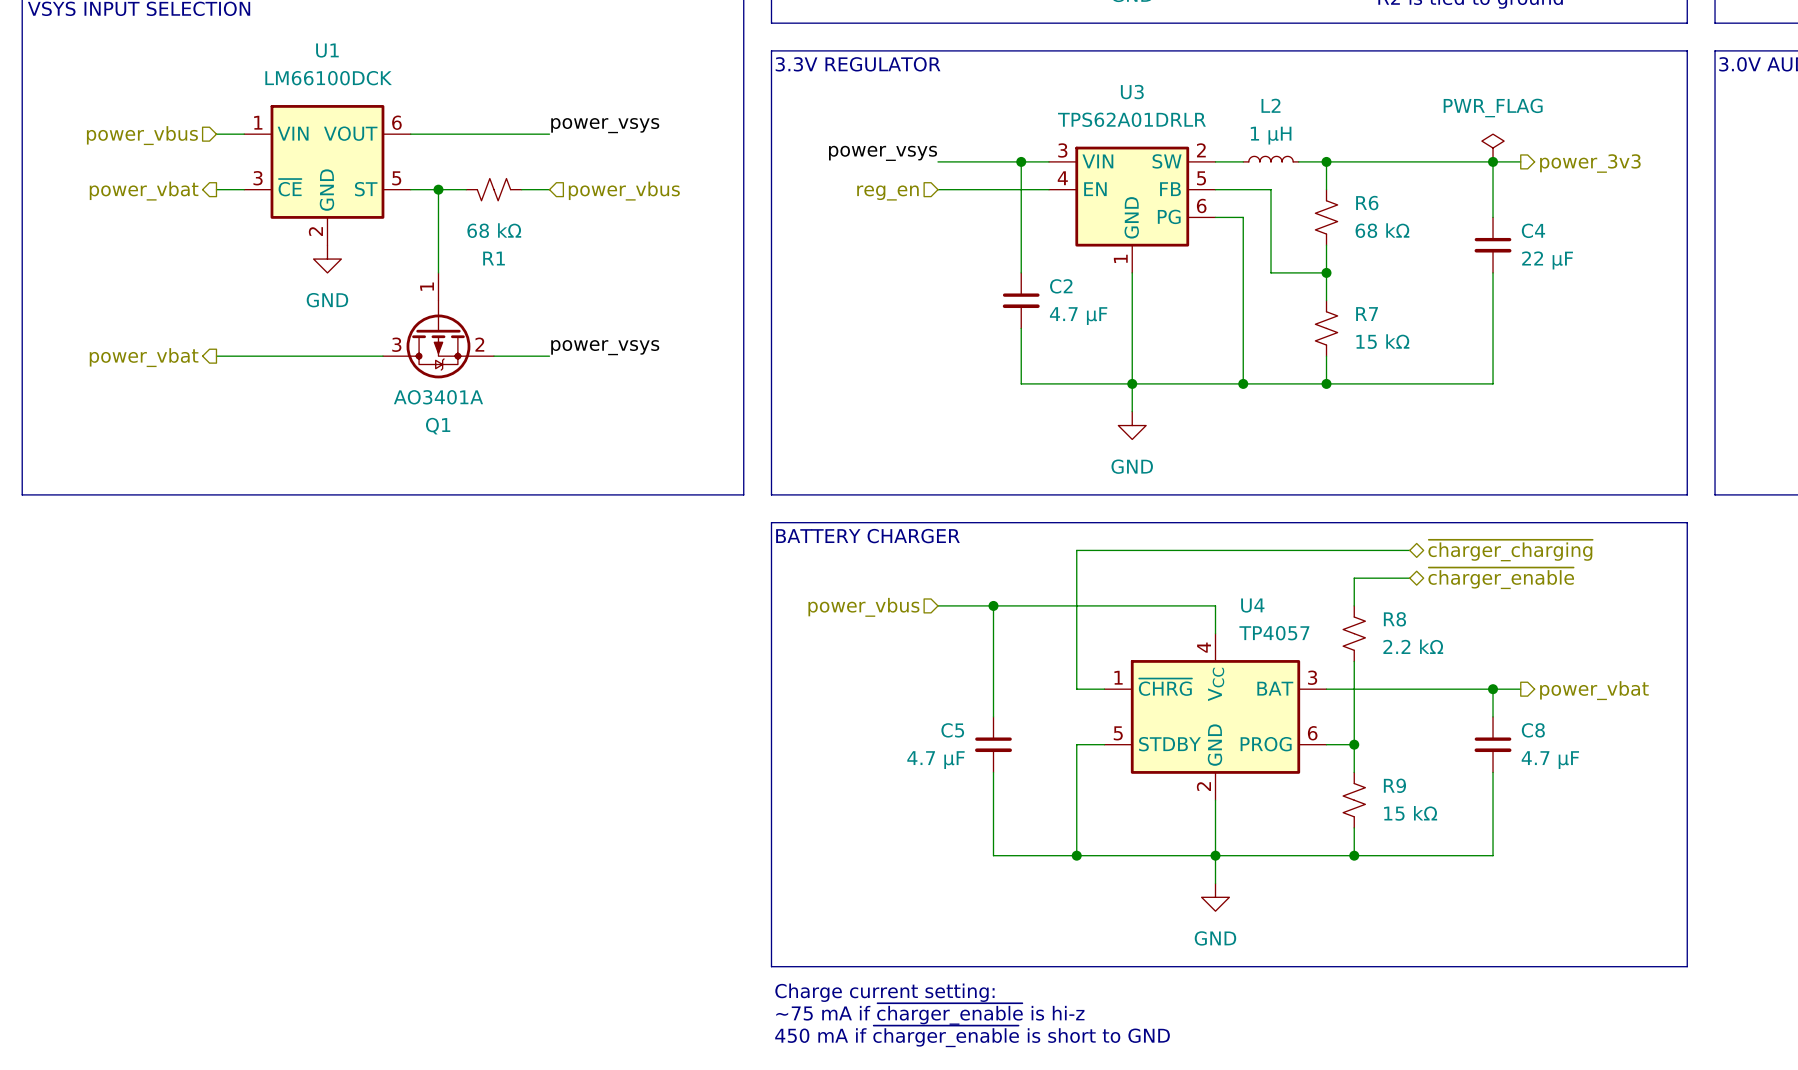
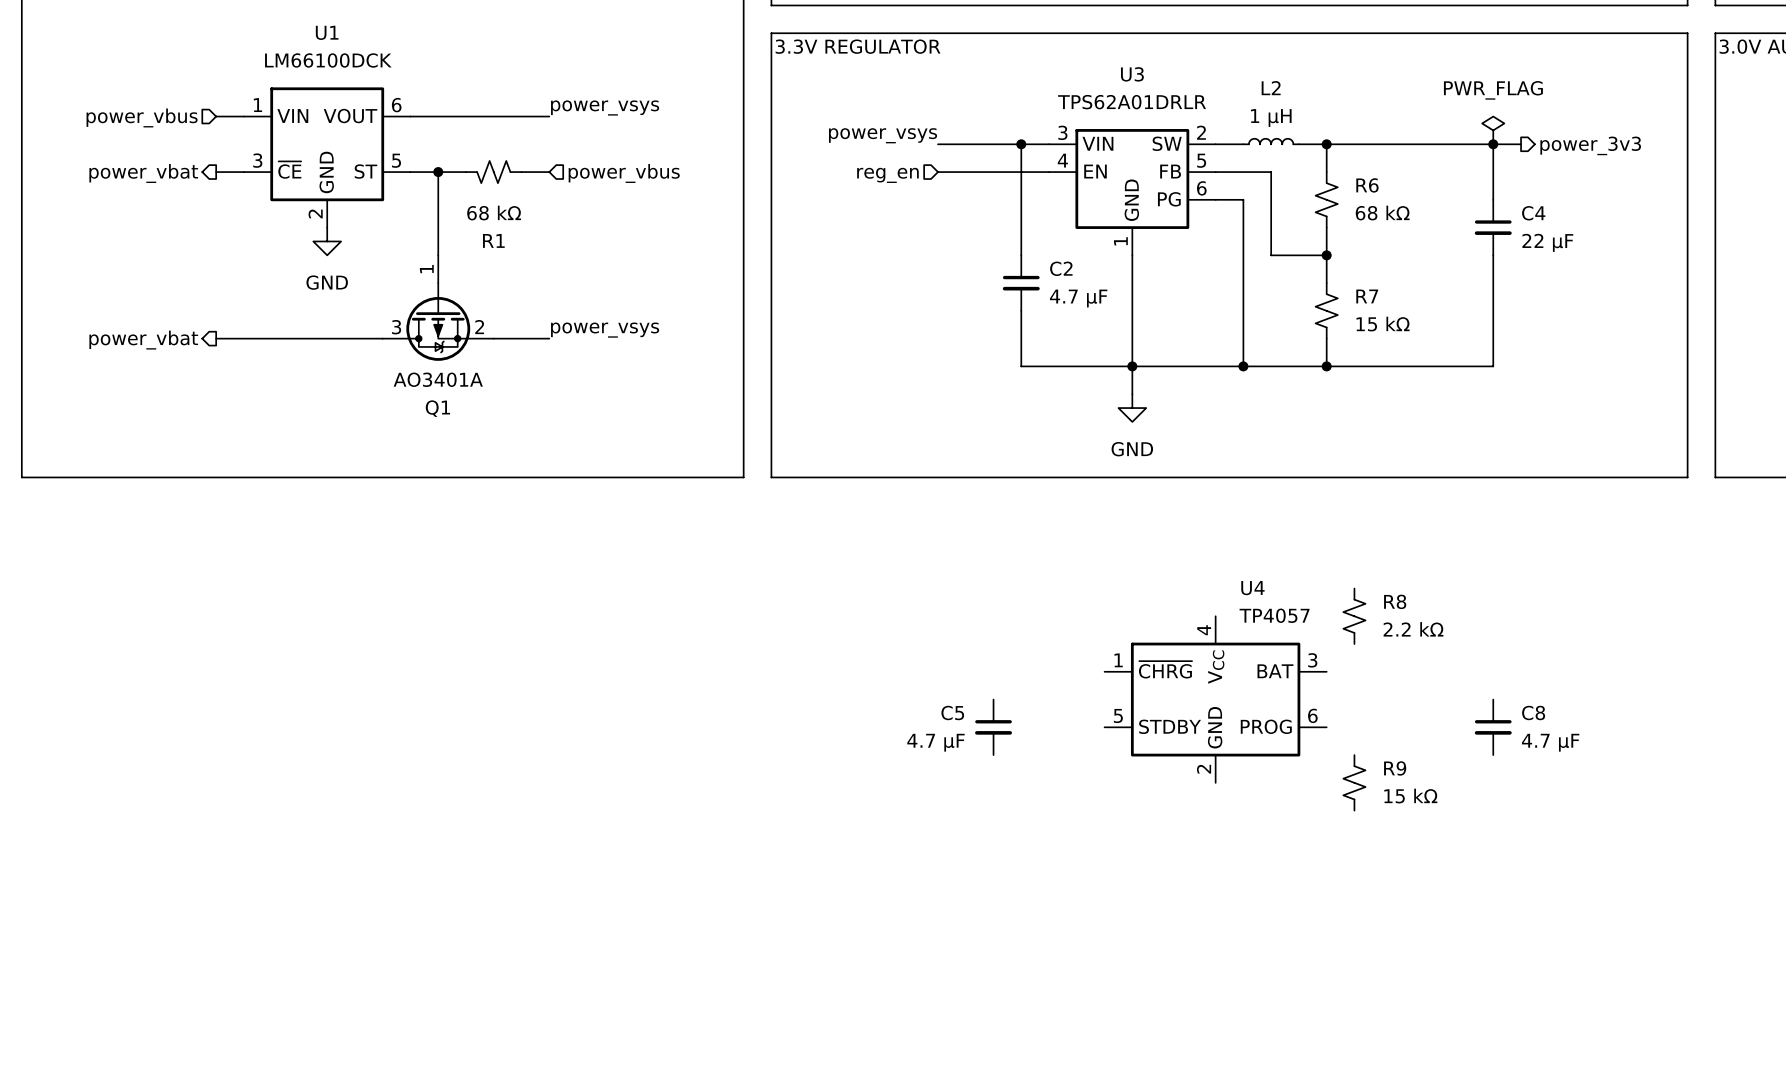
line: (771, 522) (1687, 522) (1687, 966) (771, 966) (771, 522) -> none
text: BATTERY CHARGER (867, 536) -> none
wire: (1409, 550) (1076, 550) (1076, 689) (1104, 689) -> none
hierarchical label: ~{charger_charging} (1510, 550) -> none
wire: (1409, 578) (1354, 578) (1354, 605) -> none
hierarchical label: ~{charger_enable} (1501, 578) -> none
wire: (937, 605) (1215, 605) (1215, 633) -> none
wire: (993, 605) (993, 716) -> none
junction: (993, 605) -> none
hierarchical label: power_vbus (863, 607) -> none
wire: (1354, 661) (1354, 772) -> none
wire: (1326, 689) (1520, 689) -> none
wire: (1493, 689) (1493, 716) -> none
junction: (1493, 689) -> none
hierarchical label: power_vbat (1594, 690) -> none
wire: (1104, 744) (1076, 744) (1076, 855) -> none
wire: (1326, 744) (1354, 744) -> none
junction: (1354, 744) -> none
wire: (993, 772) (993, 855) (1493, 855) (1493, 772) -> none
wire: (1215, 800) (1215, 883) -> none
wire: (1354, 827) (1354, 855) -> none
junction: (1076, 855) -> none
junction: (1215, 855) -> none
junction: (1354, 855) -> none
power symbol: GND (1215, 897) -> none
text: Charge current setting: (884, 992) -> none
text: ~75 mA if ~{charger_enable} is hi-z (930, 1014) -> none
text: 450 mA if ~{charger_enable} is short to GND (972, 1036) -> none

